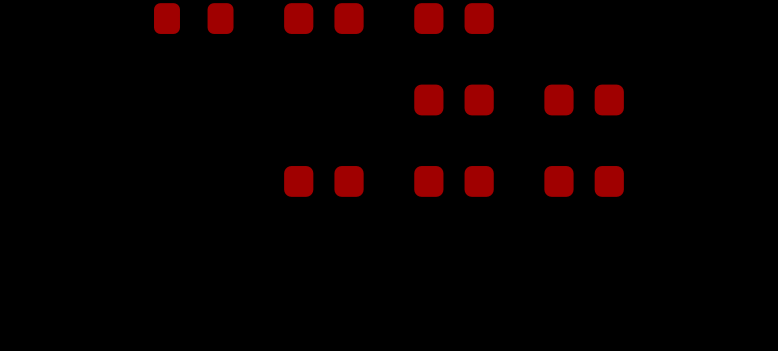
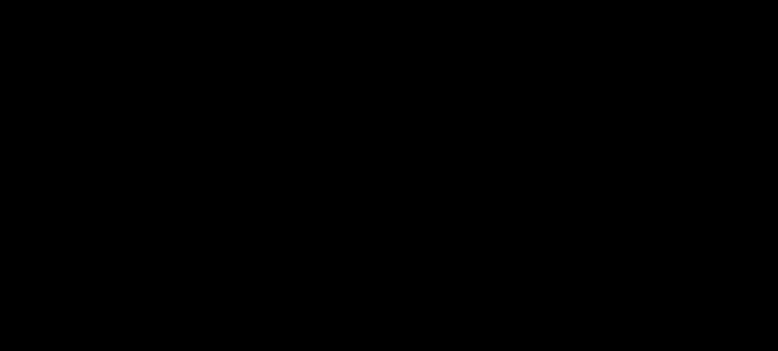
part: (193, 18) -> none
part: (323, 18) -> none
part: (454, 18) -> none
part: (454, 100) -> none
part: (584, 100) -> none
part: (323, 181) -> none
part: (454, 181) -> none
part: (584, 181) -> none

